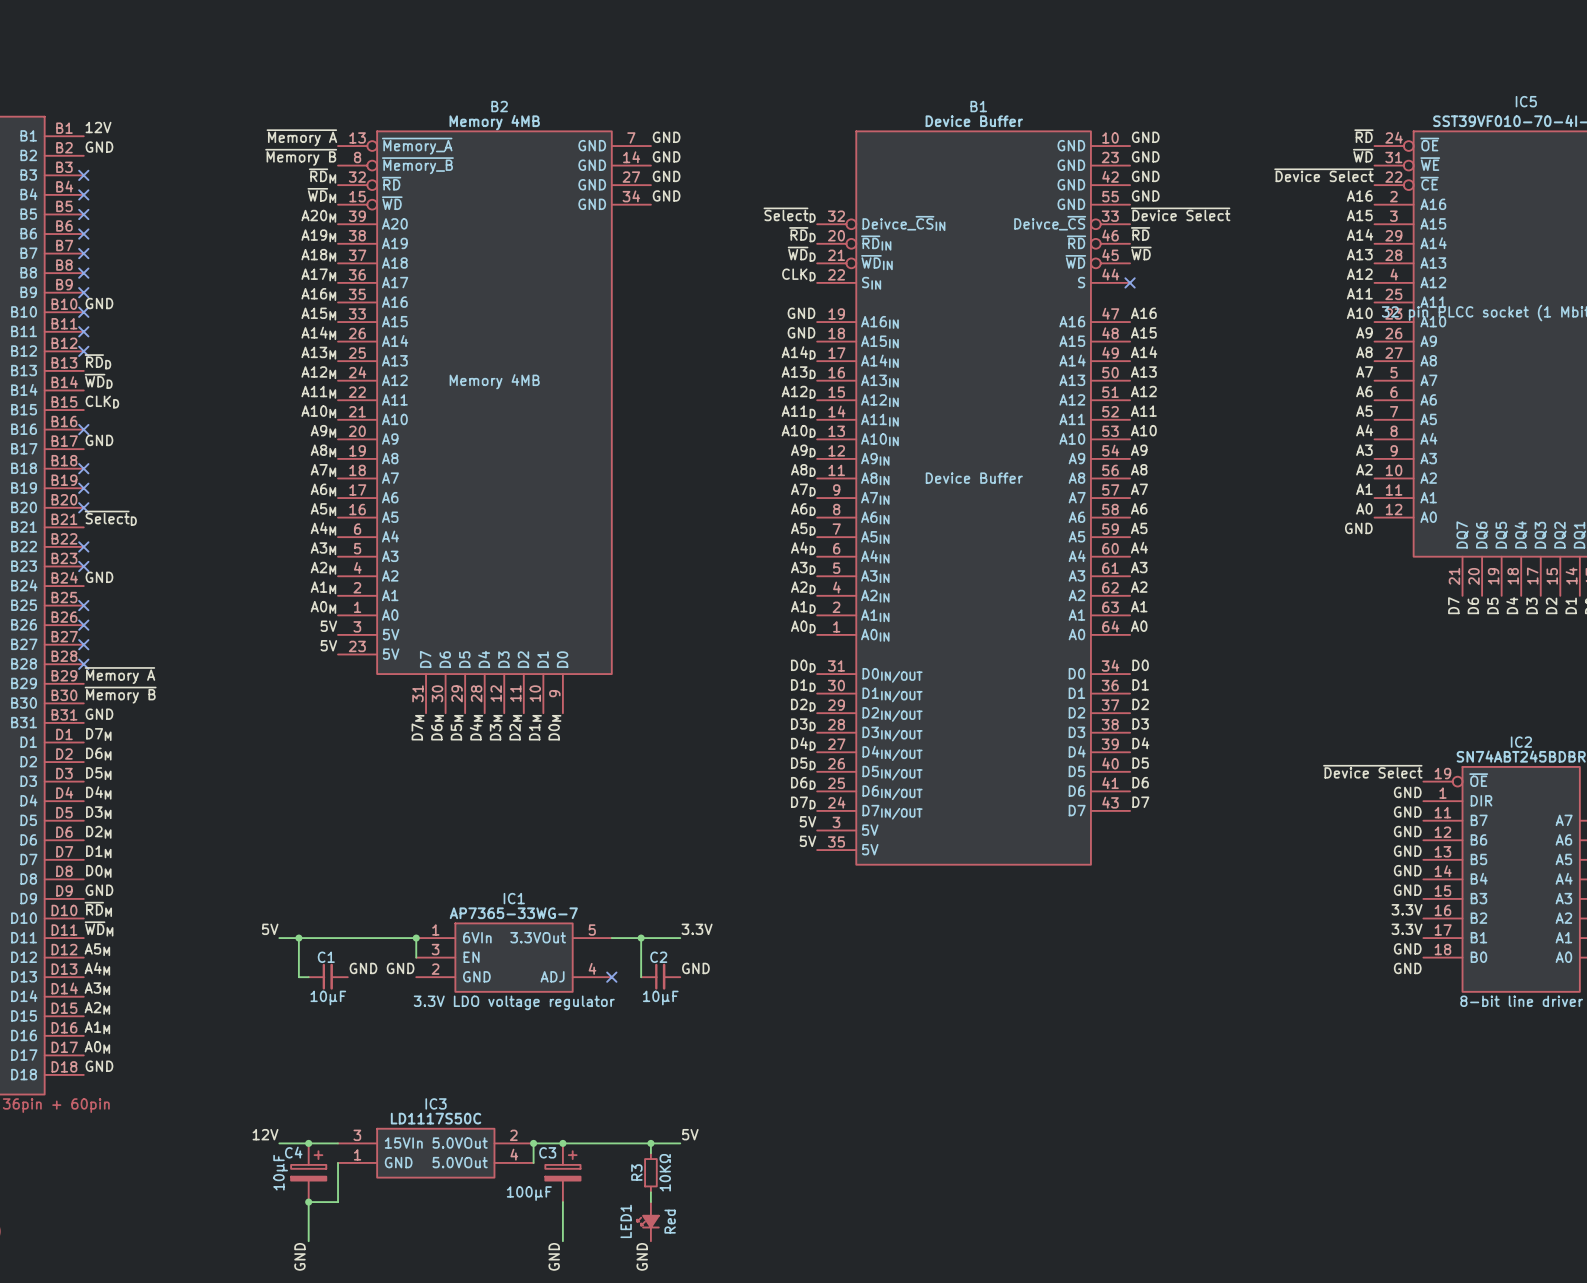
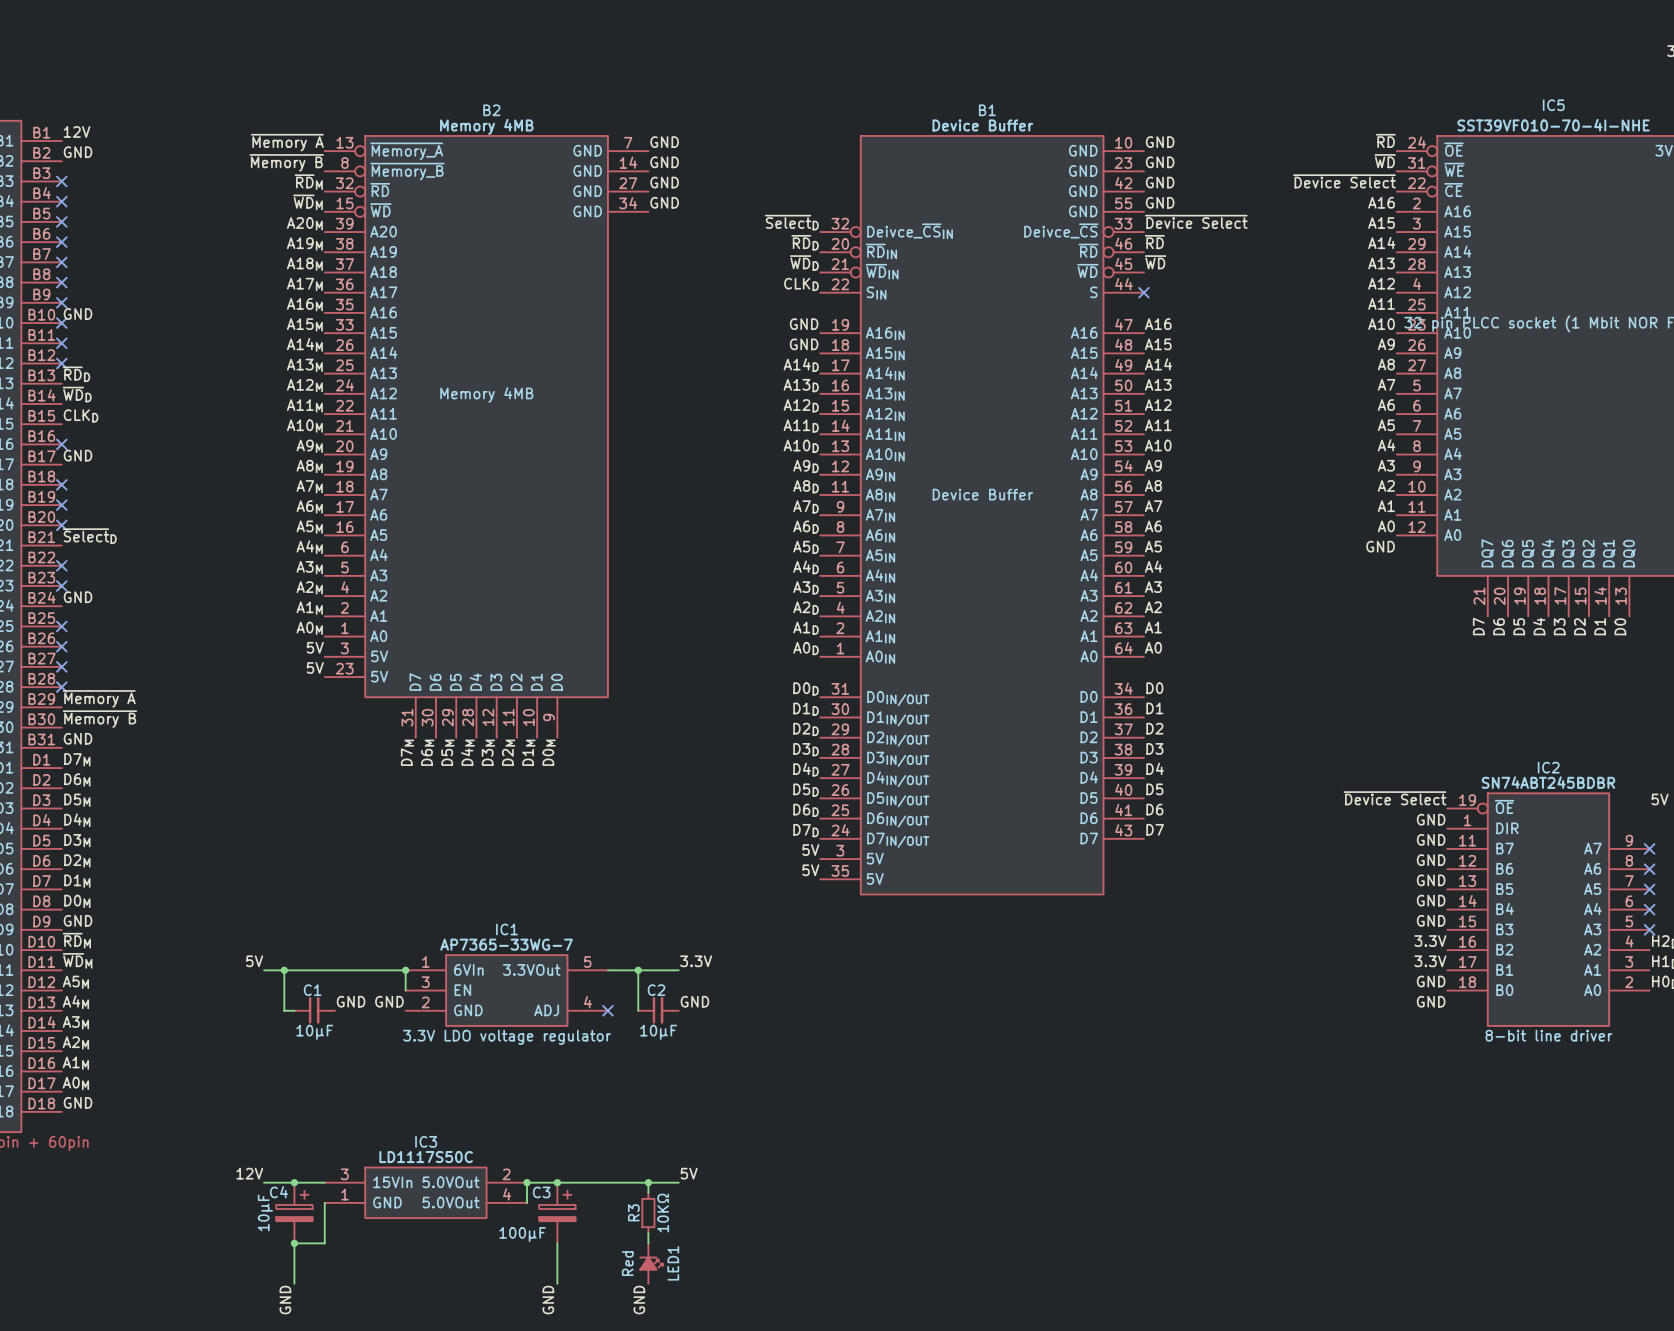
LED1 rotation: 0° (648, 1221) -> 180° (650, 1263)

